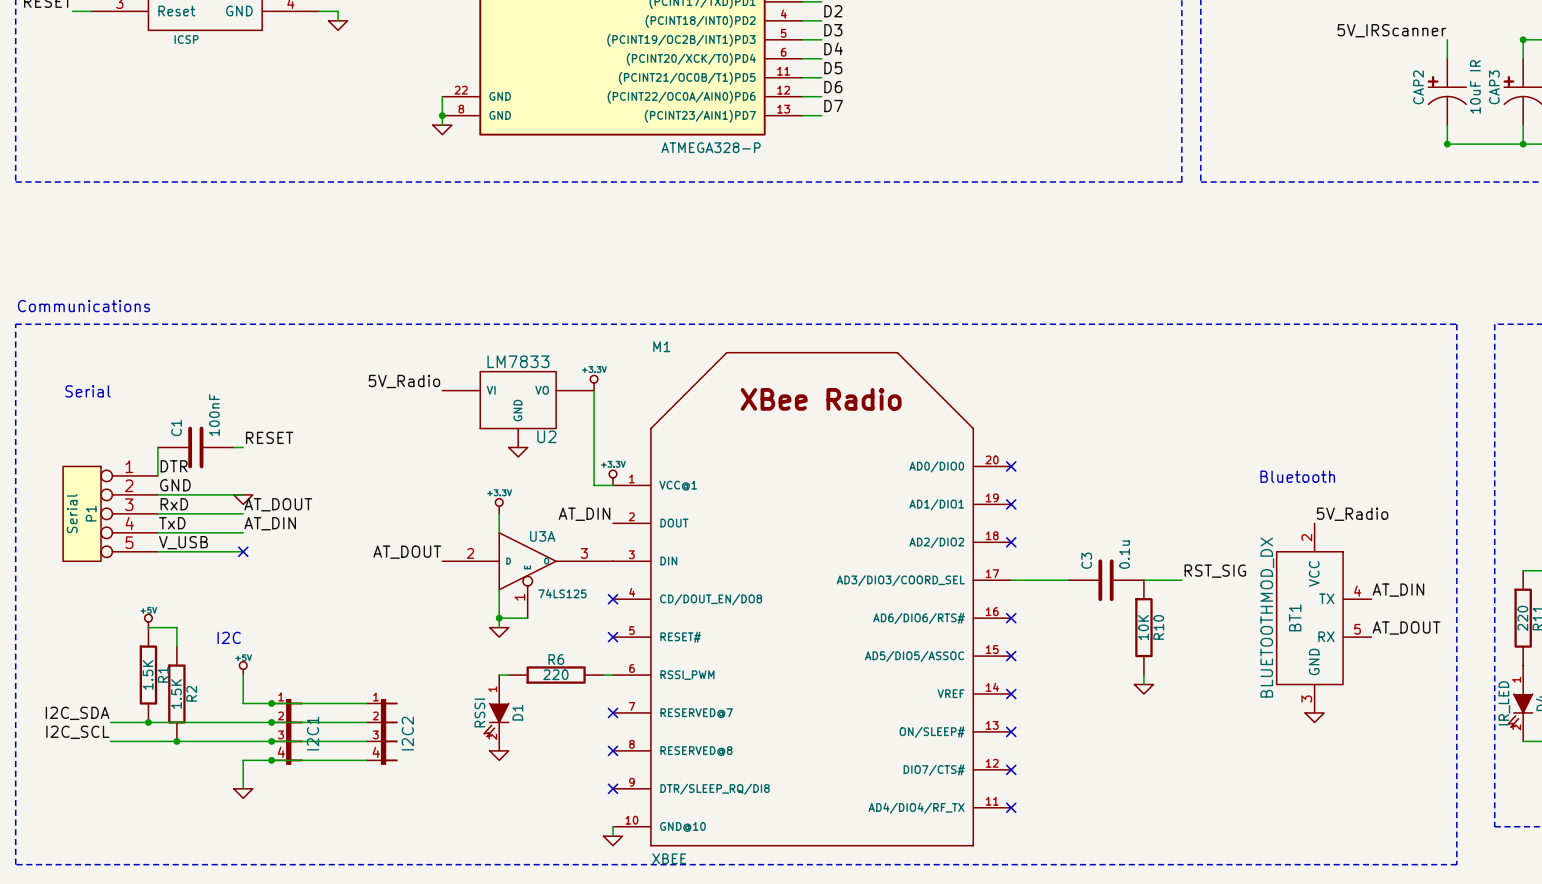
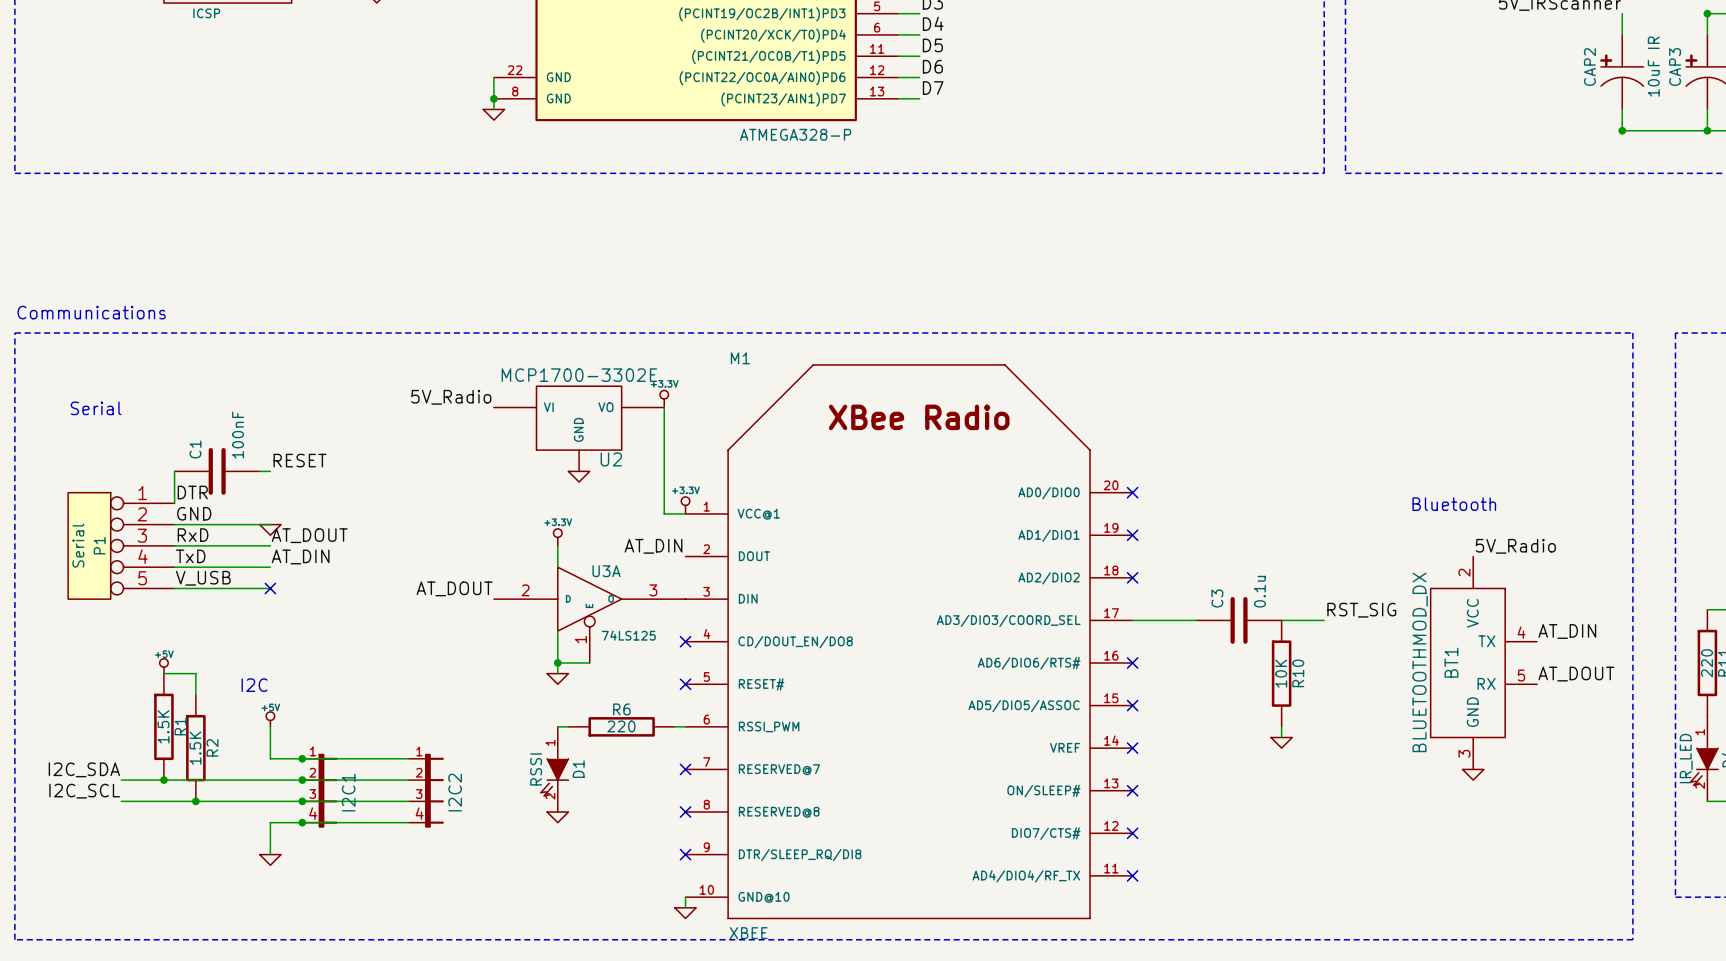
U2 value: LM7833 (518, 361) -> MCP1700-3302E (579, 375)

